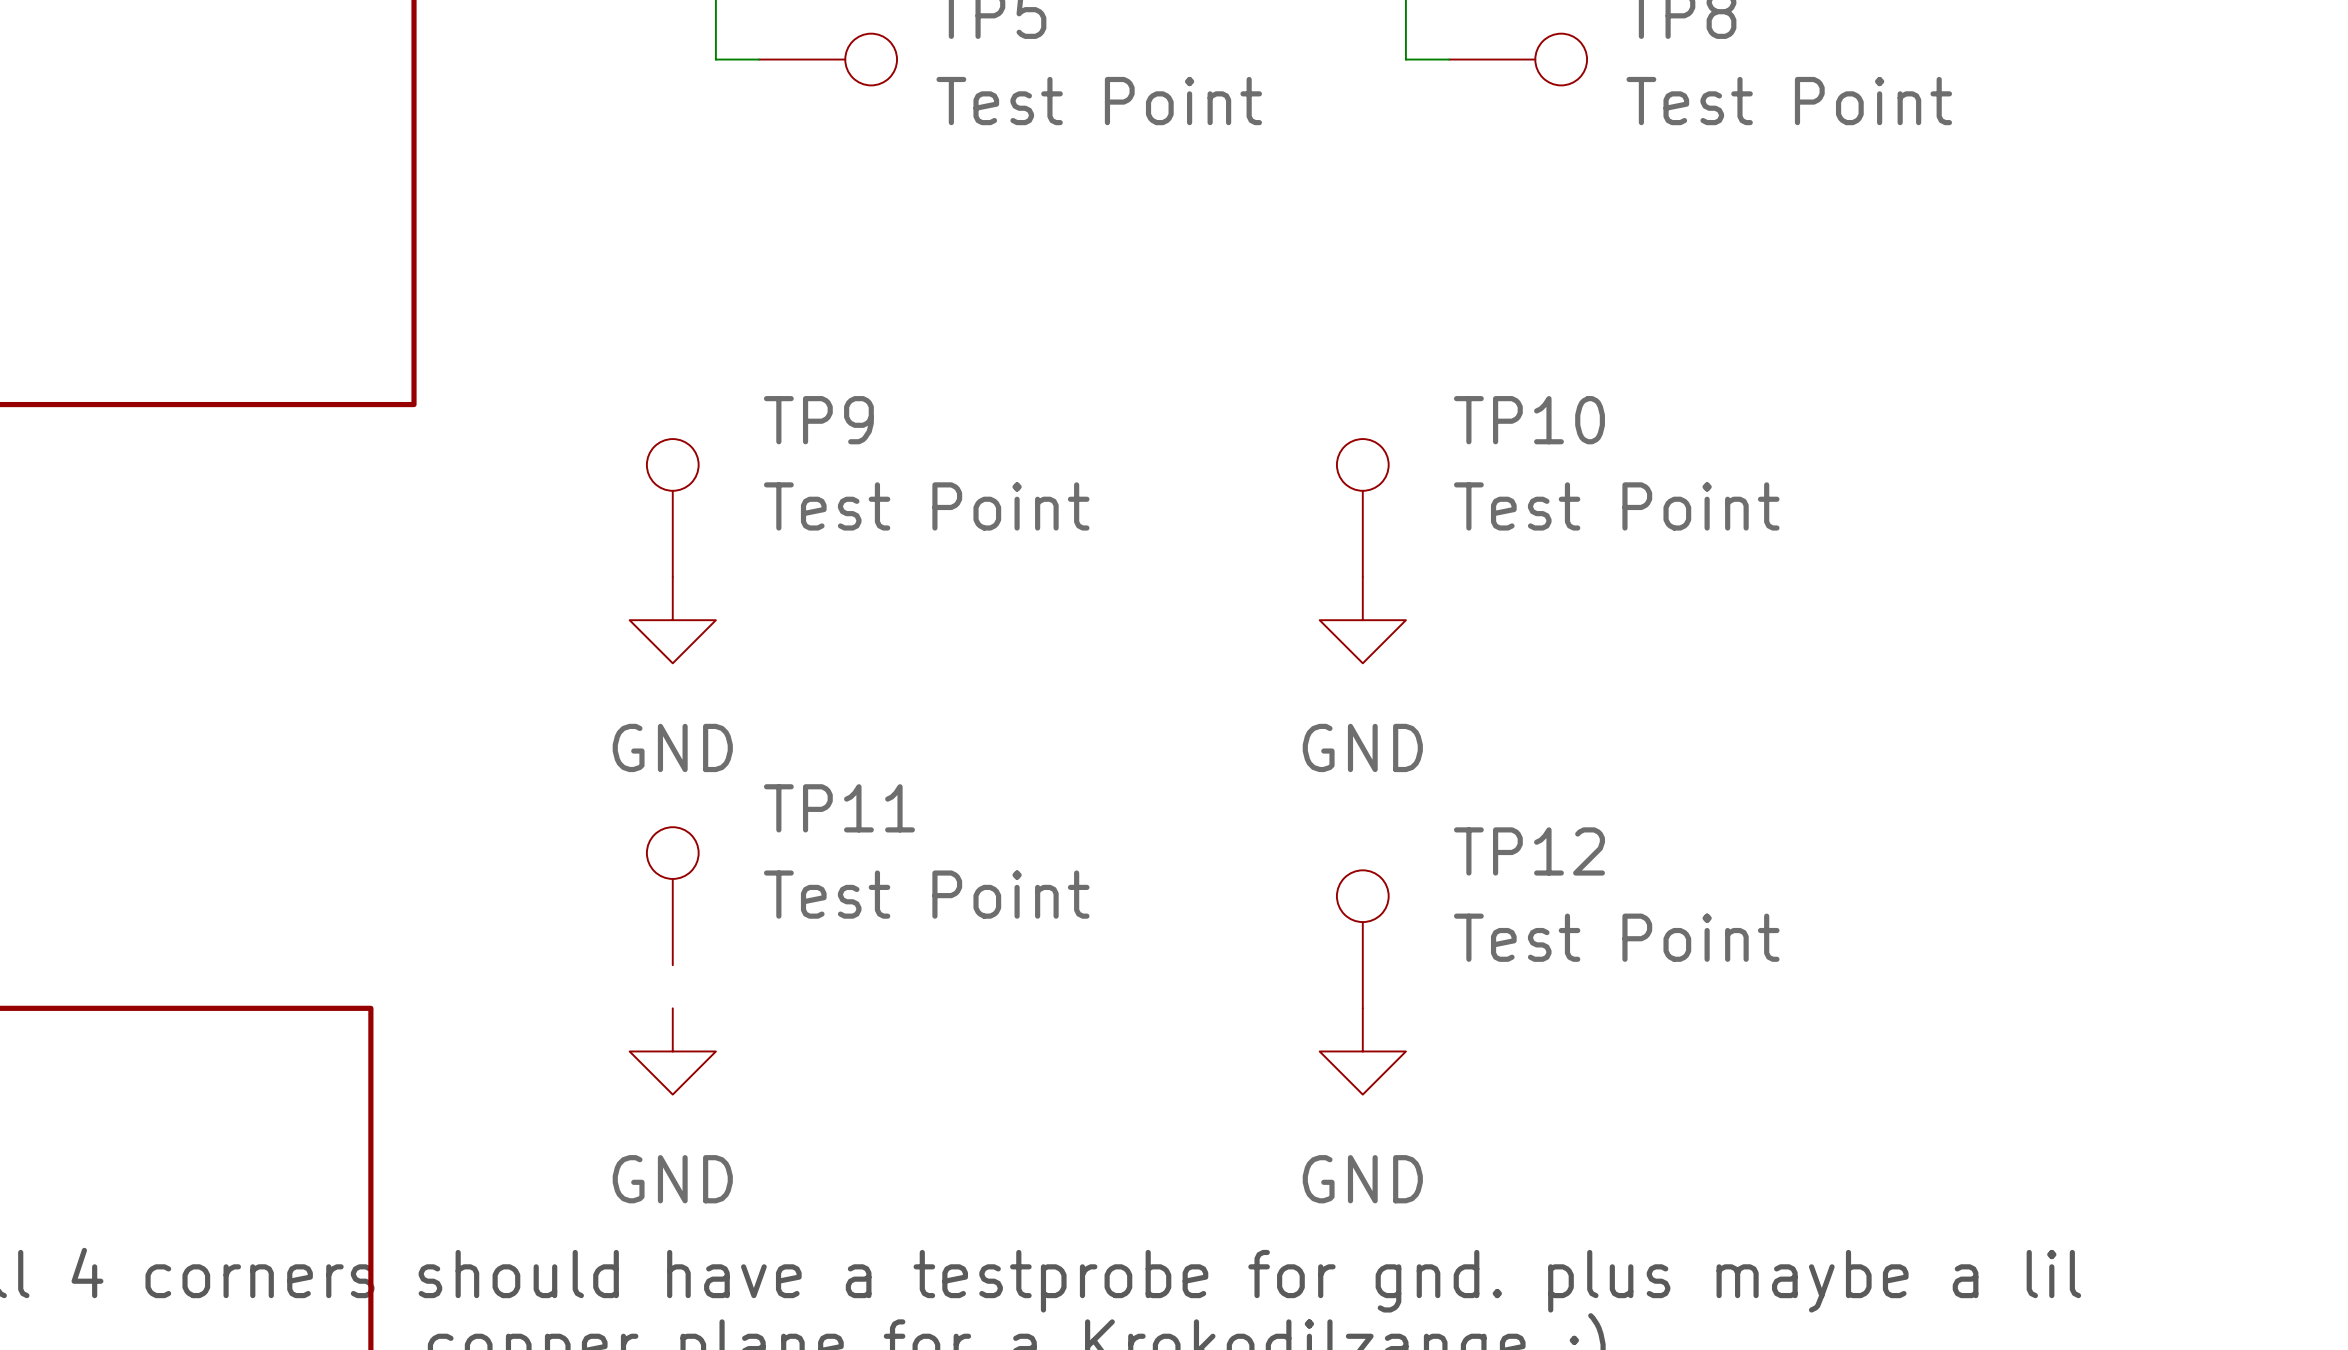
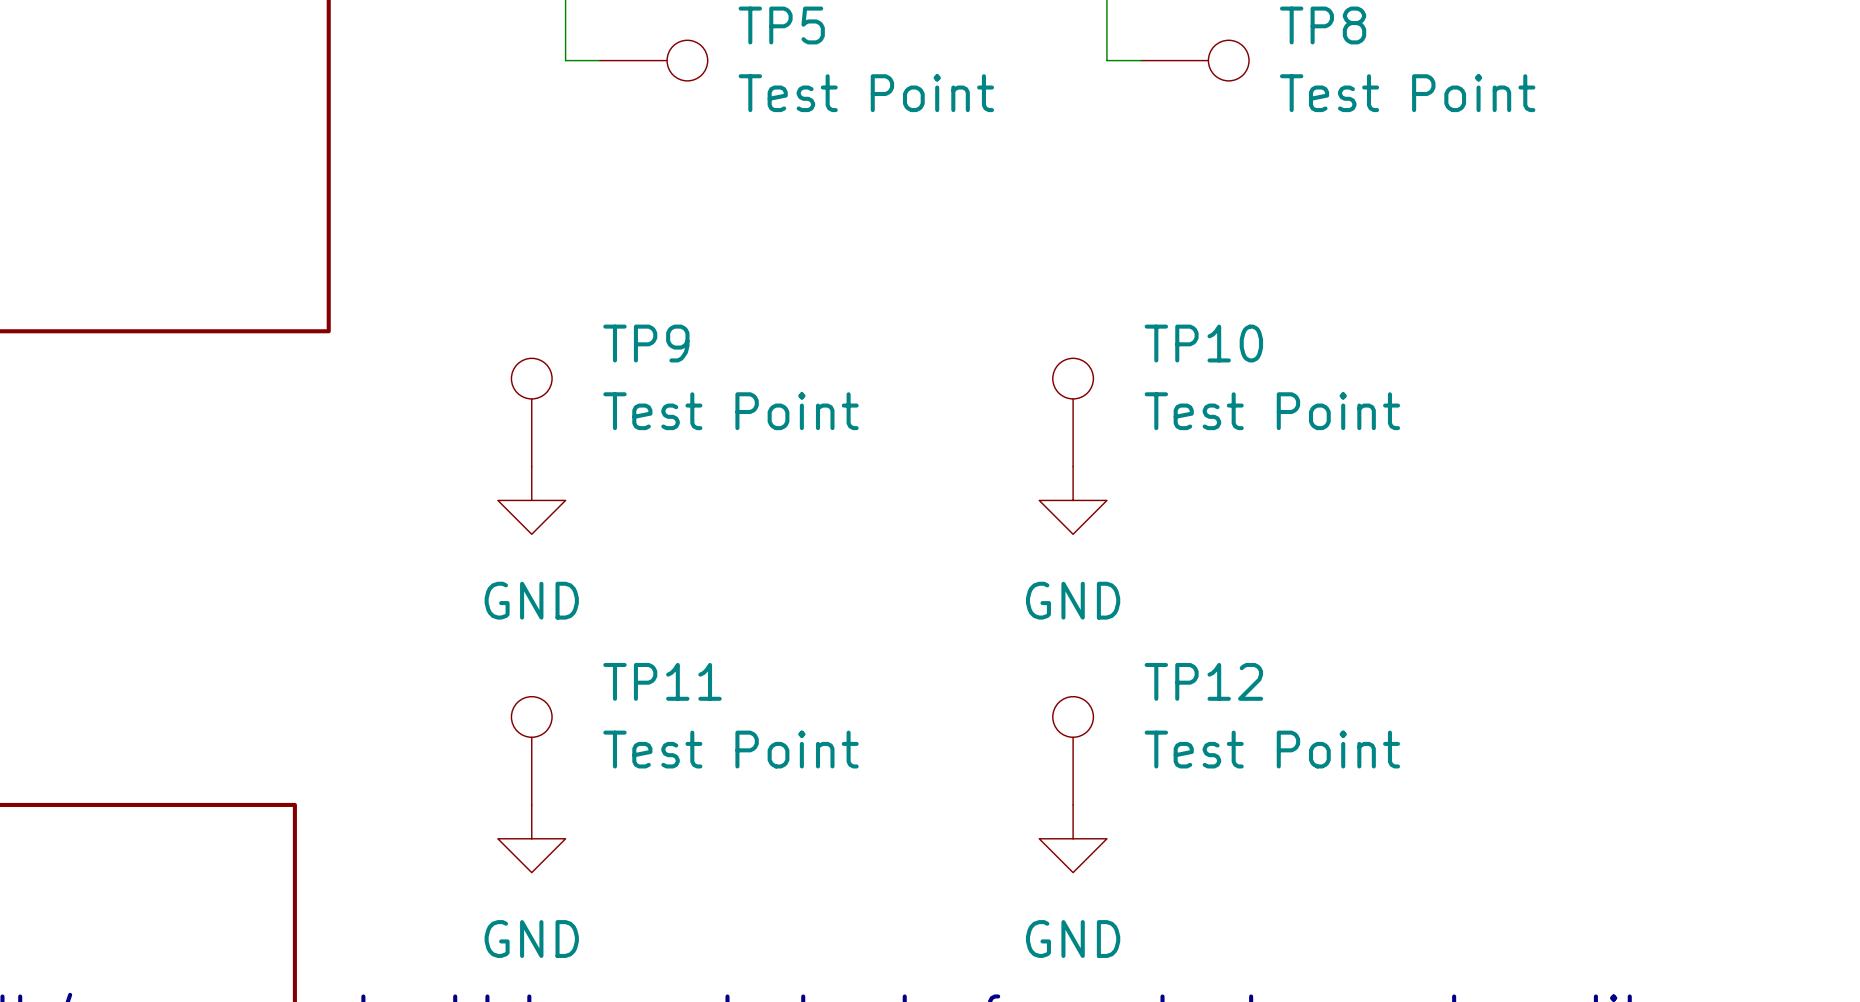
TP11 position: (672, 896) -> (531, 750)

